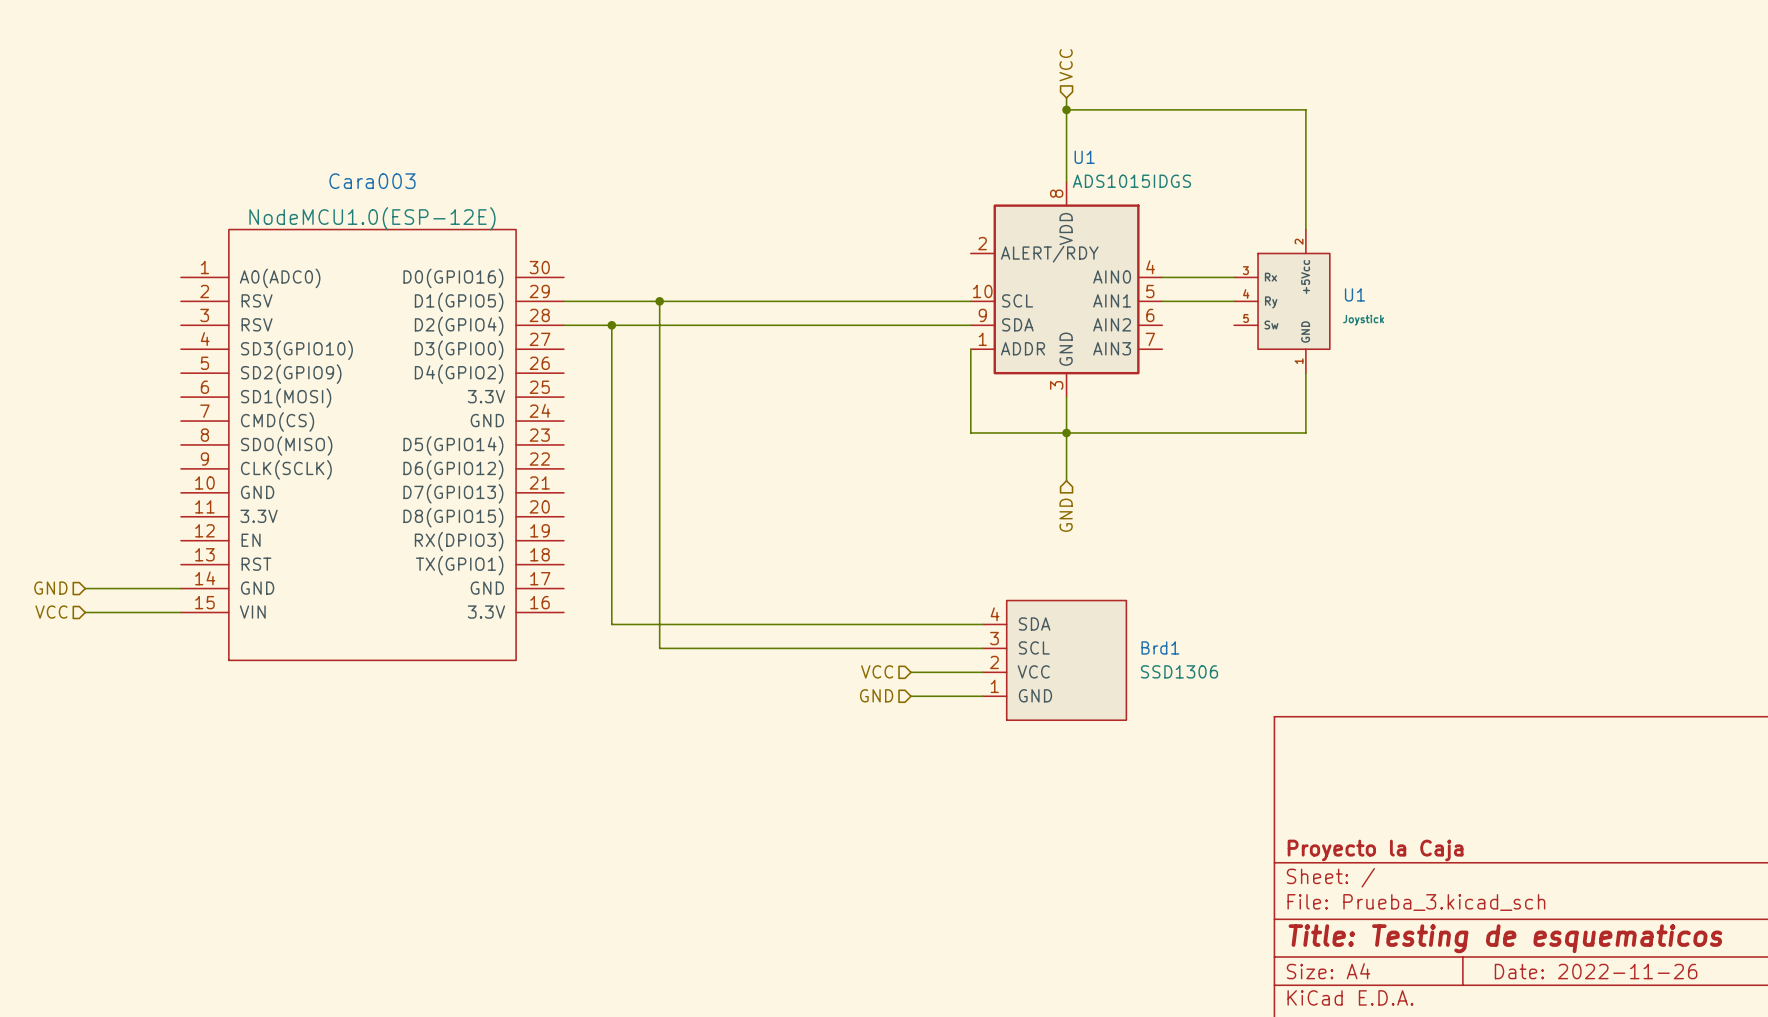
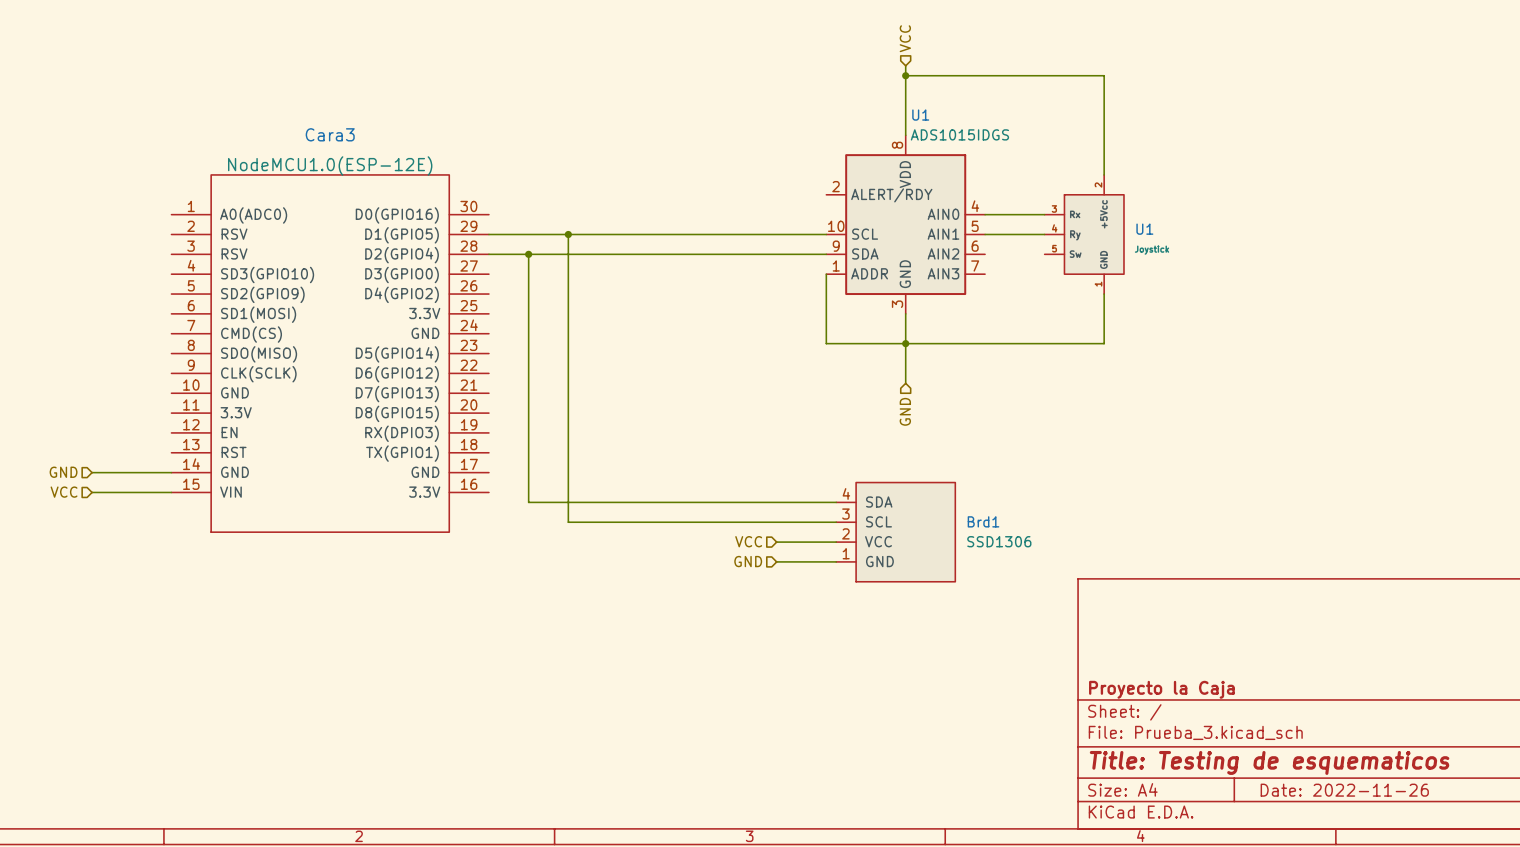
Cara003 name: Cara003 (372, 181) -> Cara3 (330, 134)

